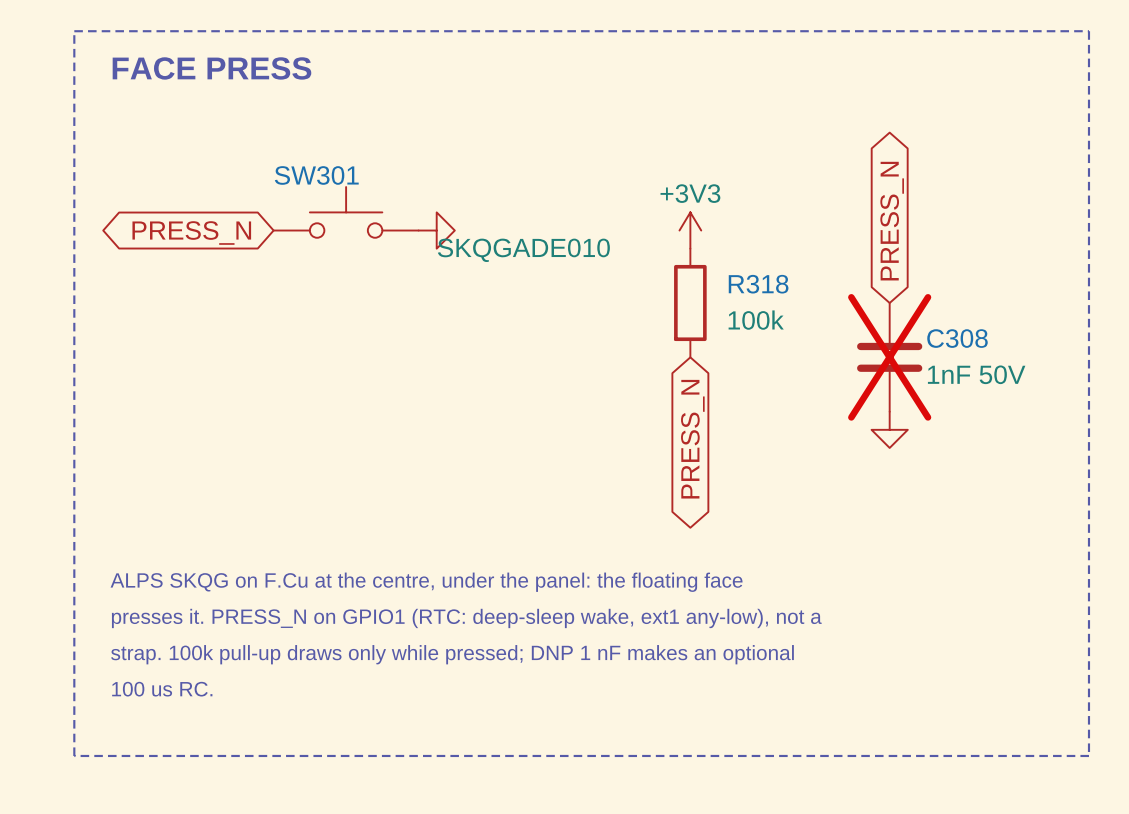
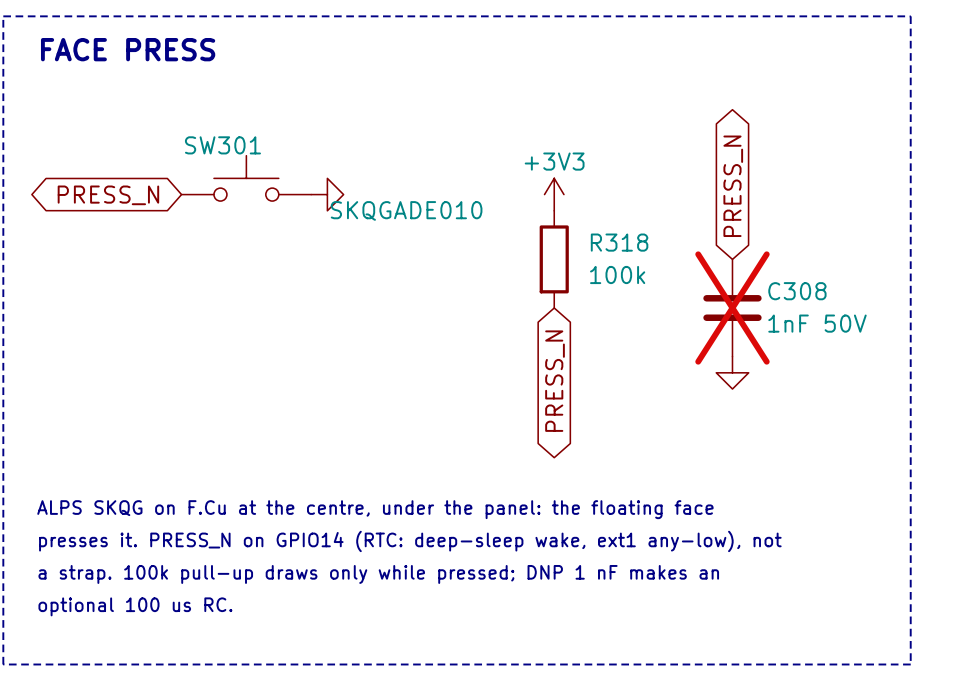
text: presses it. PRESS_N on GPIO1 (RTC: deep-sleep wake, ext1 any-low), not a (466, 618) -> presses it. PRESS_N on GPIO14 (RTC: deep-sleep wake, ext1 any-low), not (410, 541)
text: strap. 100k pull-up draws only while pressed; DNP 1 nF makes an optional (452, 654) -> a strap. 100k pull-up draws only while pressed; DNP 1 nF makes an (378, 574)
text: 100 us RC. (162, 689) -> optional 100 us RC. (135, 606)

